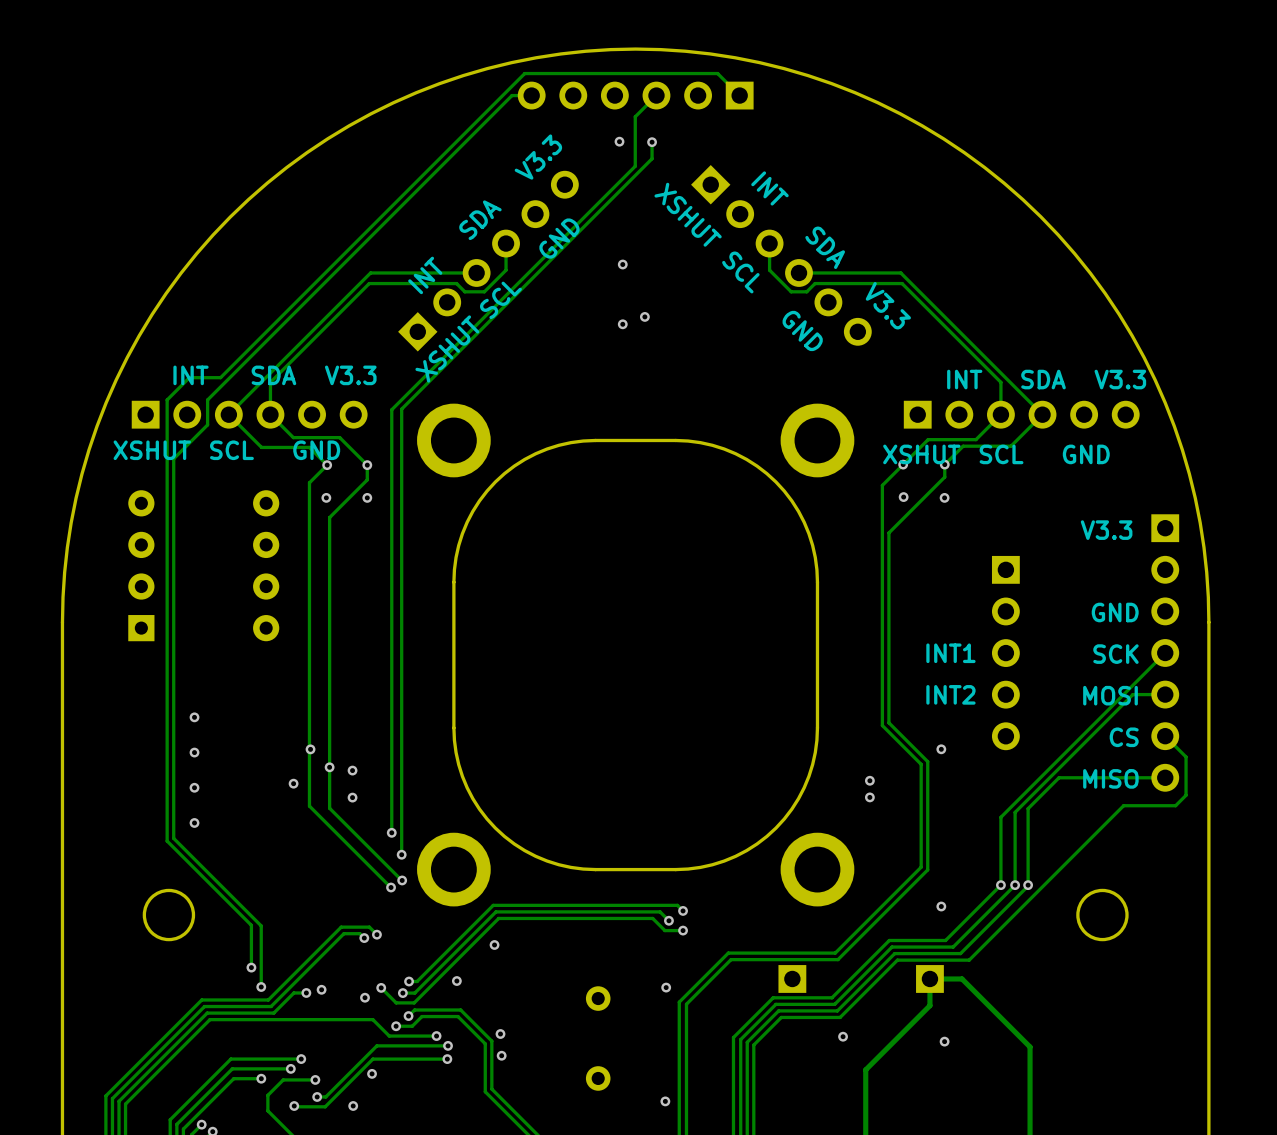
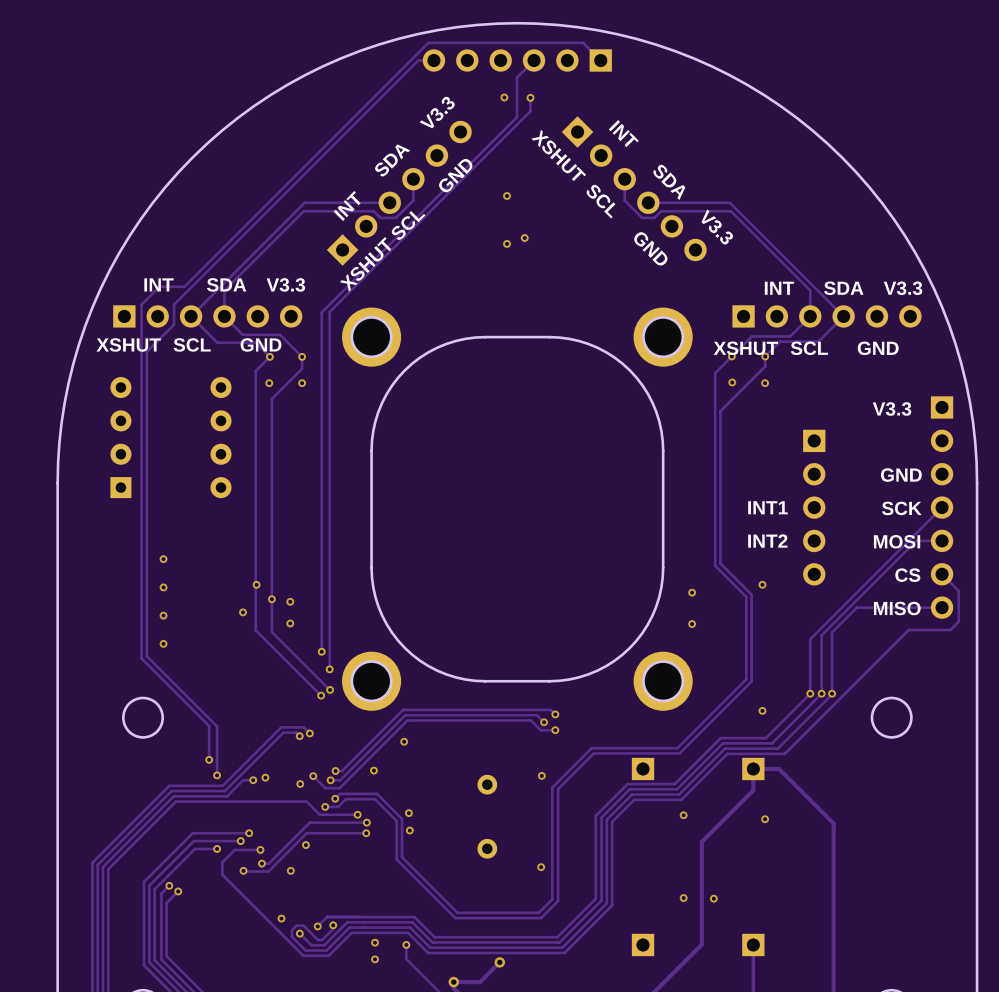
via: none -> (692, 592)
via: (869, 780) -> none
via: (869, 797) -> none
via: none -> (692, 624)

